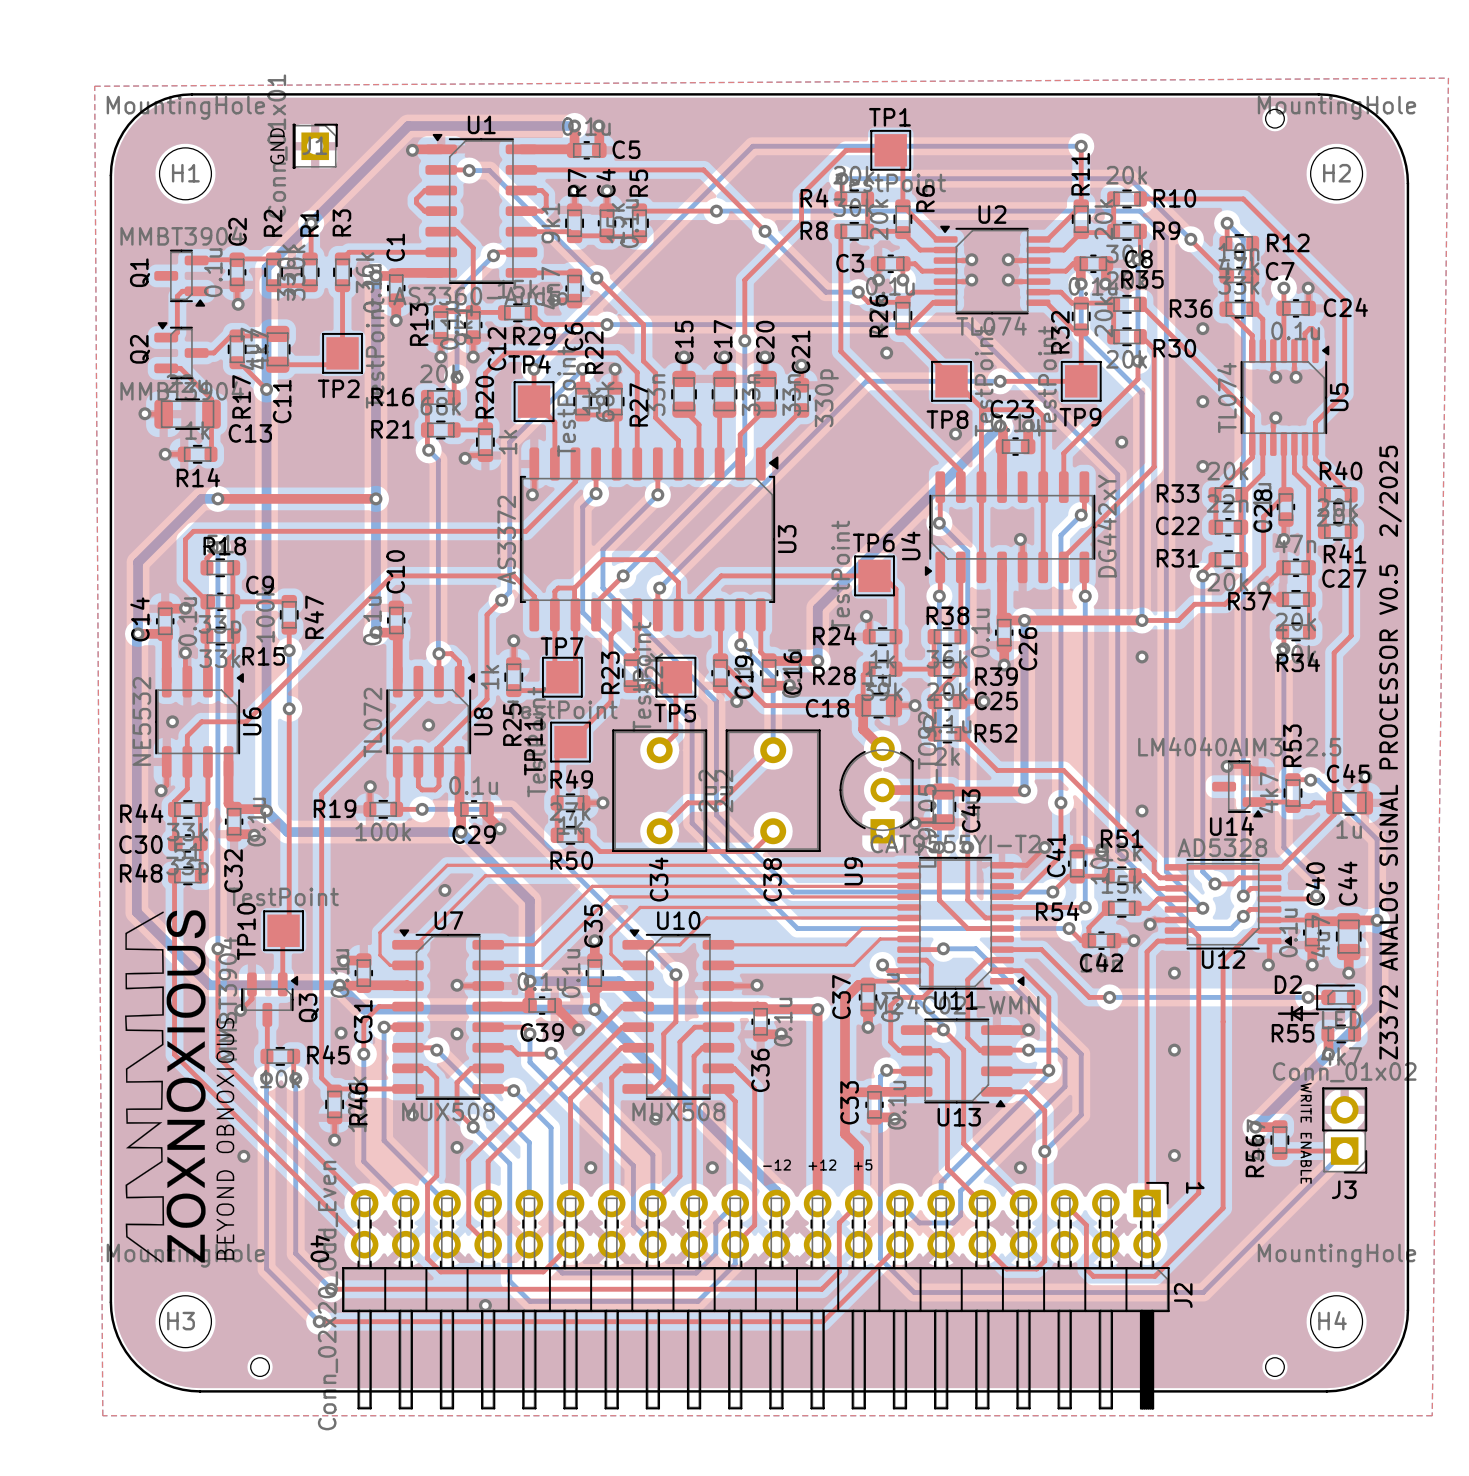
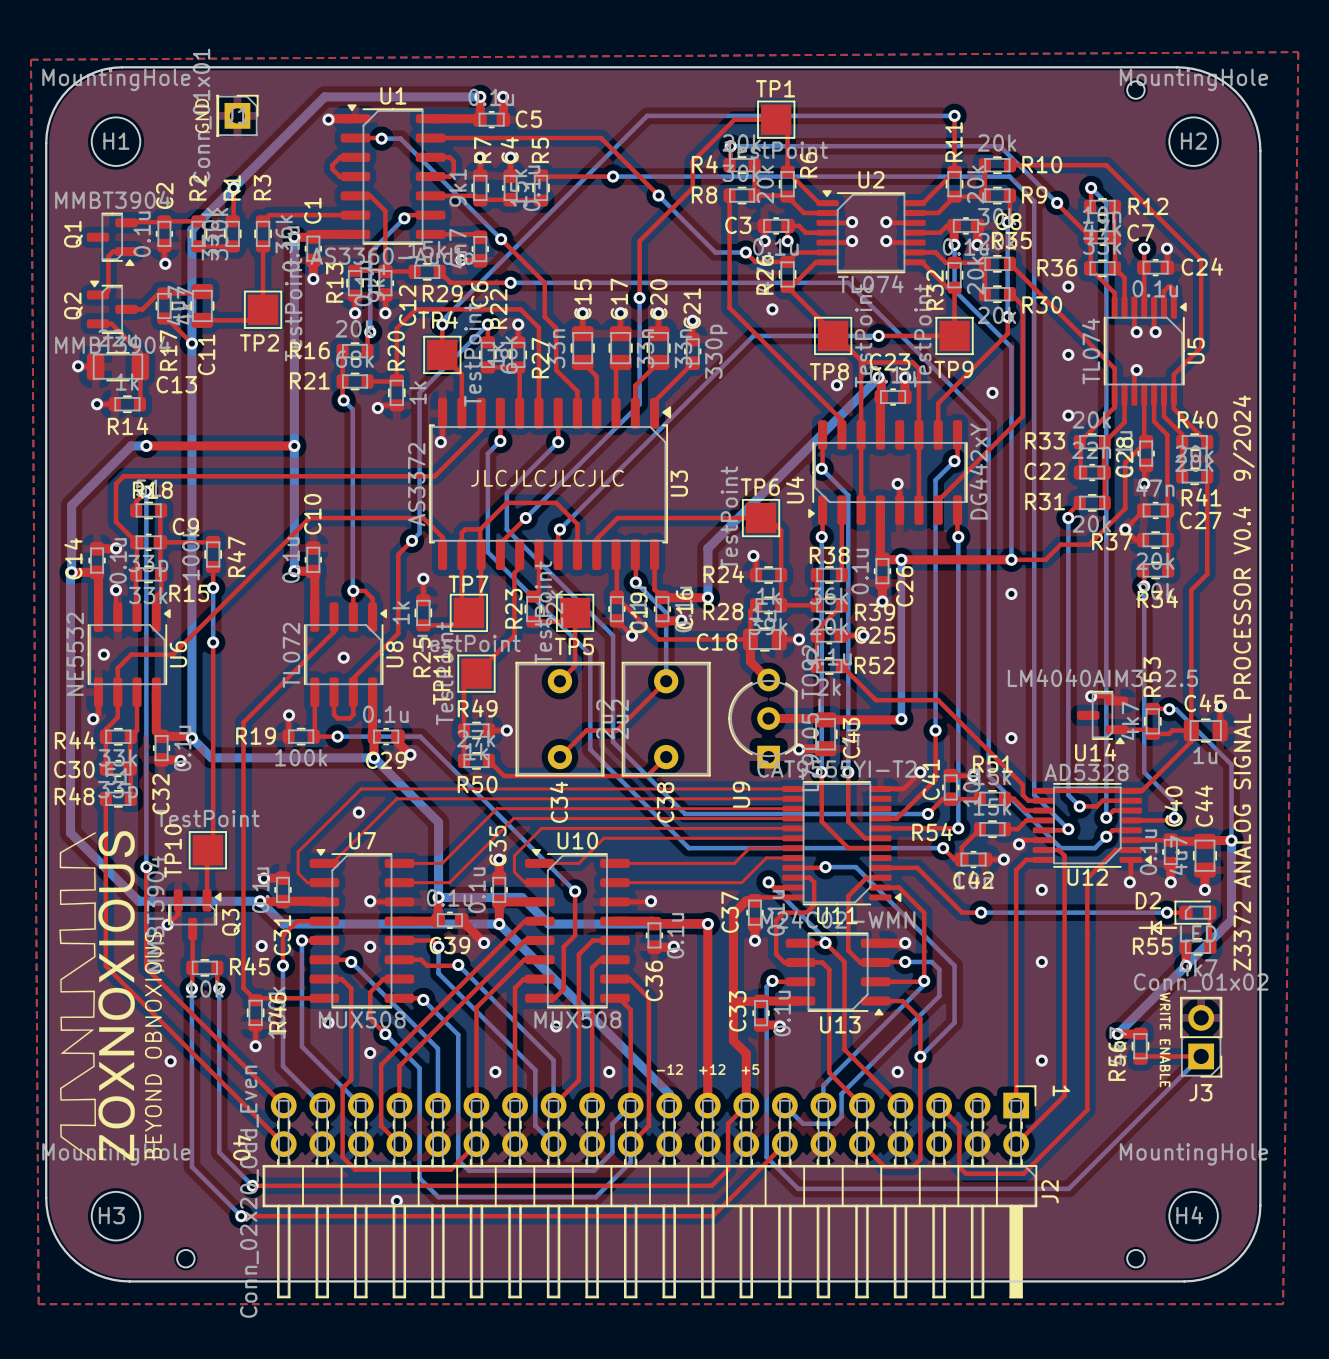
text: none -> JLCJLCJLCJLC (547, 478)
text: Z3372 ANALOG SIGNAL PROCESSOR V0.5 2/2025 (1390, 752) -> Z3372 ANALOG SIGNAL PROCESSOR V0.4 9/2024 (1243, 683)

